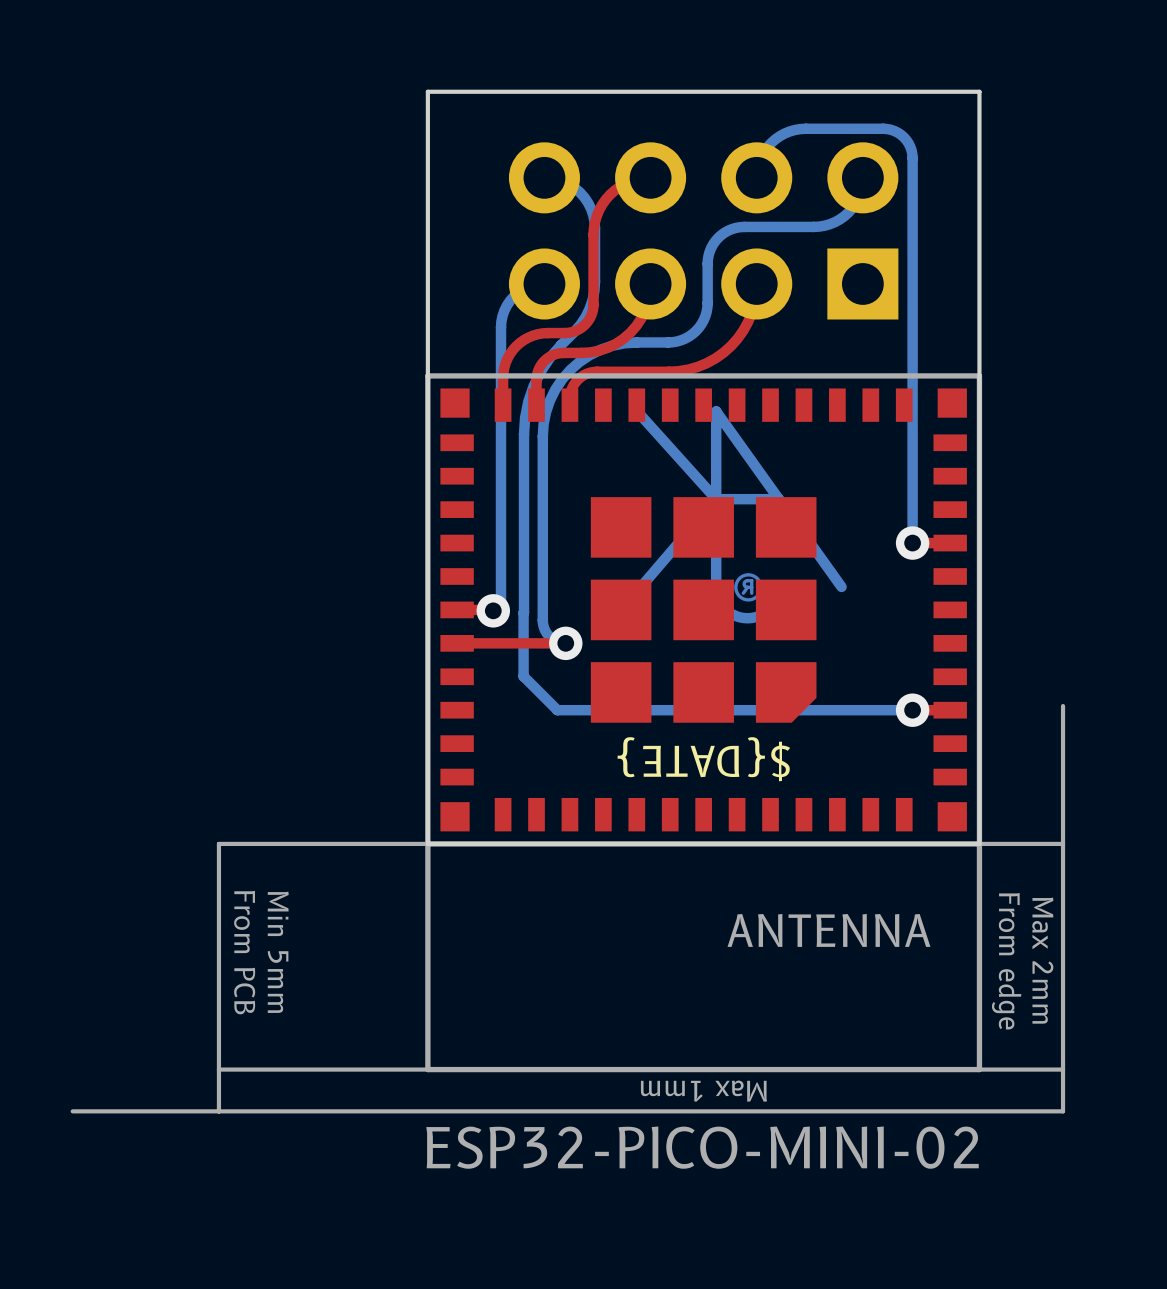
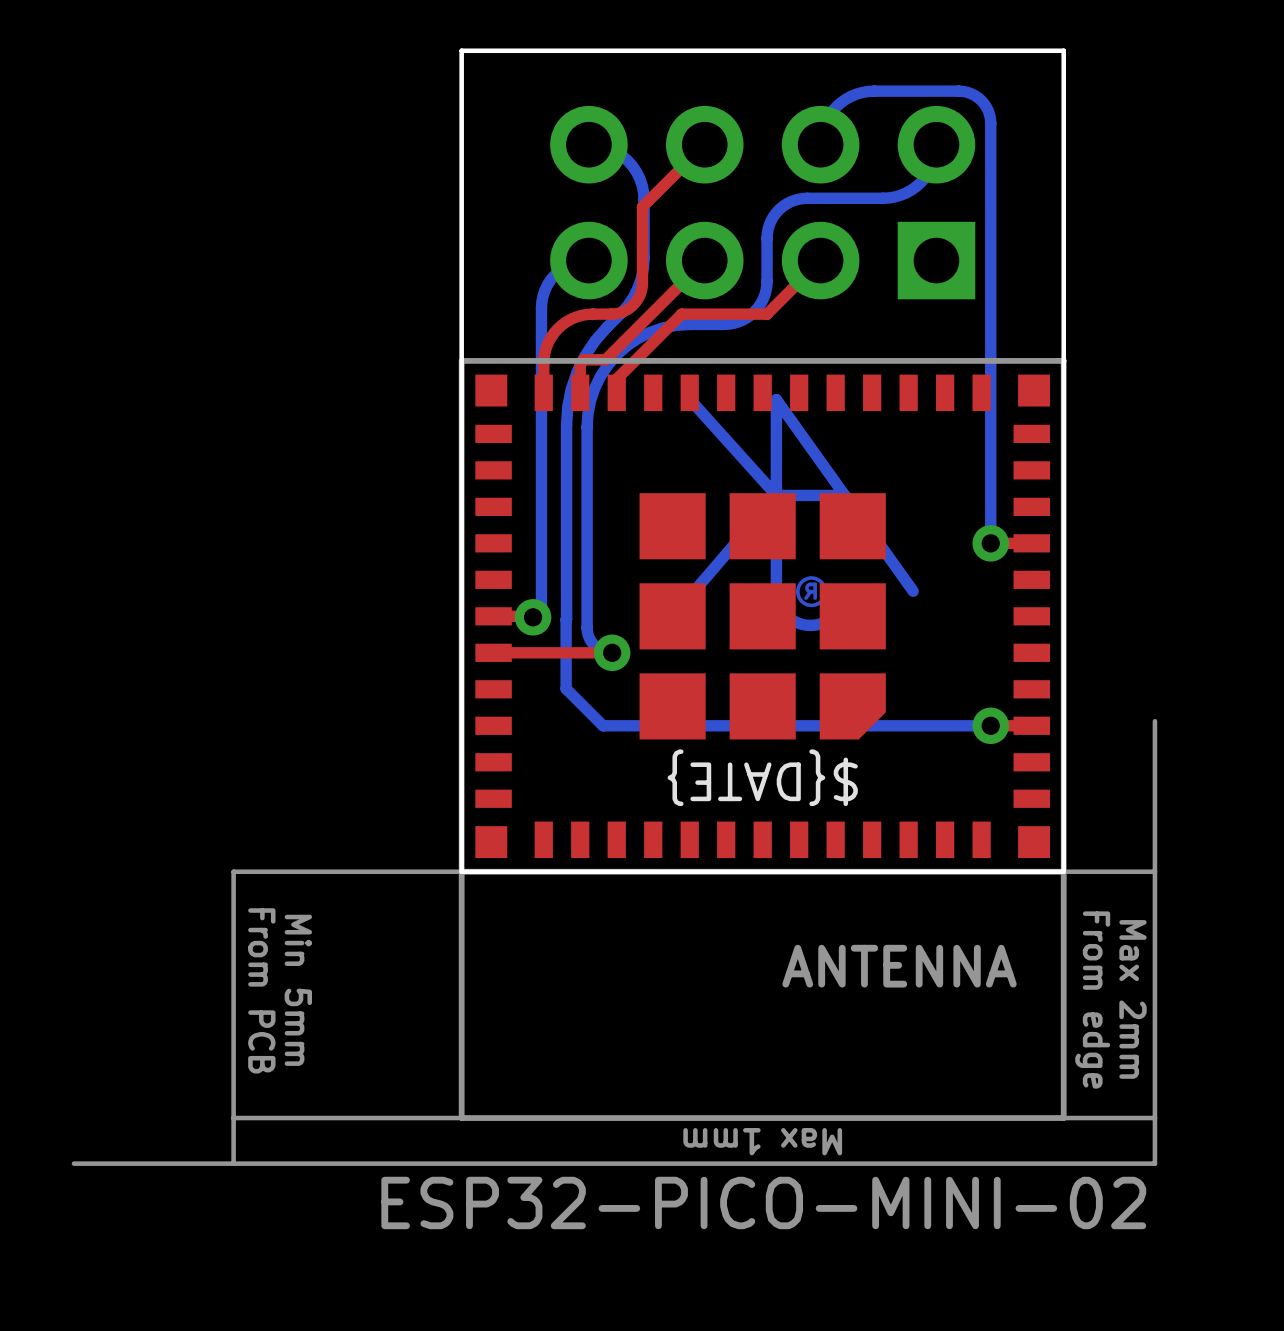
top track: (650, 177) (631, 181) (610, 194) (599, 210) (593, 234) -> (704, 144) (642, 206)
top track: (650, 283) (645, 310) (636, 325) (623, 338) (599, 350) (553, 355) (540, 366) (536, 380) -> (704, 260) (605, 359) (583, 359) (580, 365)
top track: (756, 283) (751, 312) (743, 330) (731, 346) (715, 358) (697, 366) (678, 371) (590, 372) (575, 382) (569, 398) -> (820, 260) (767, 314) (681, 314) (616, 379) (616, 385)

